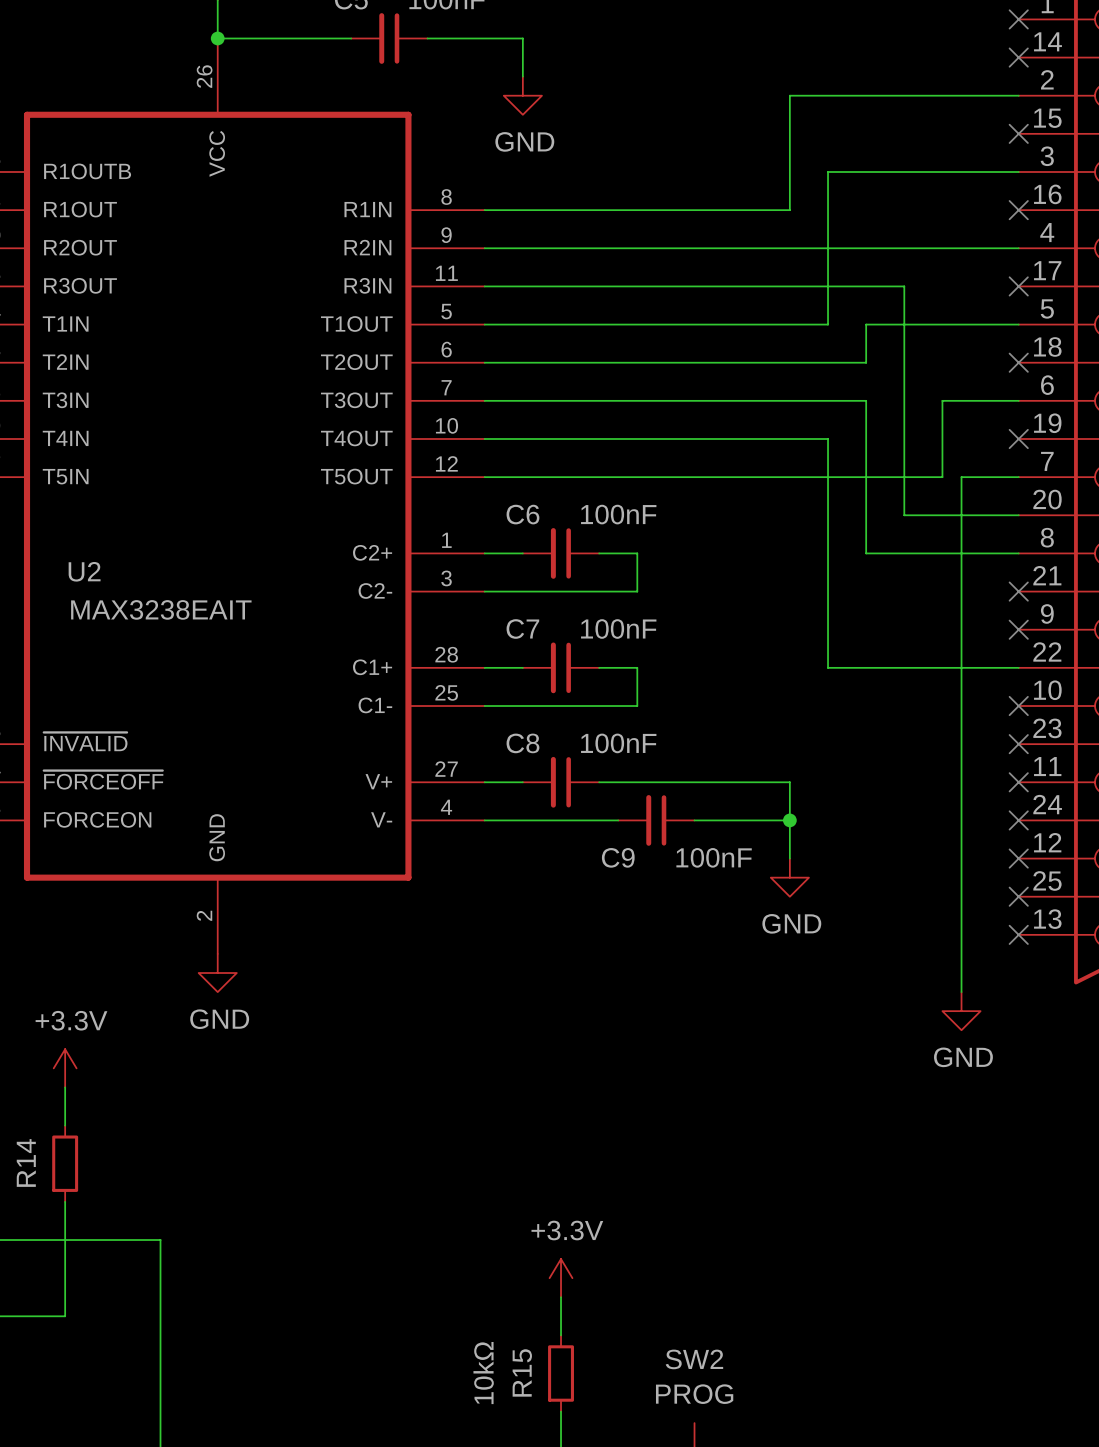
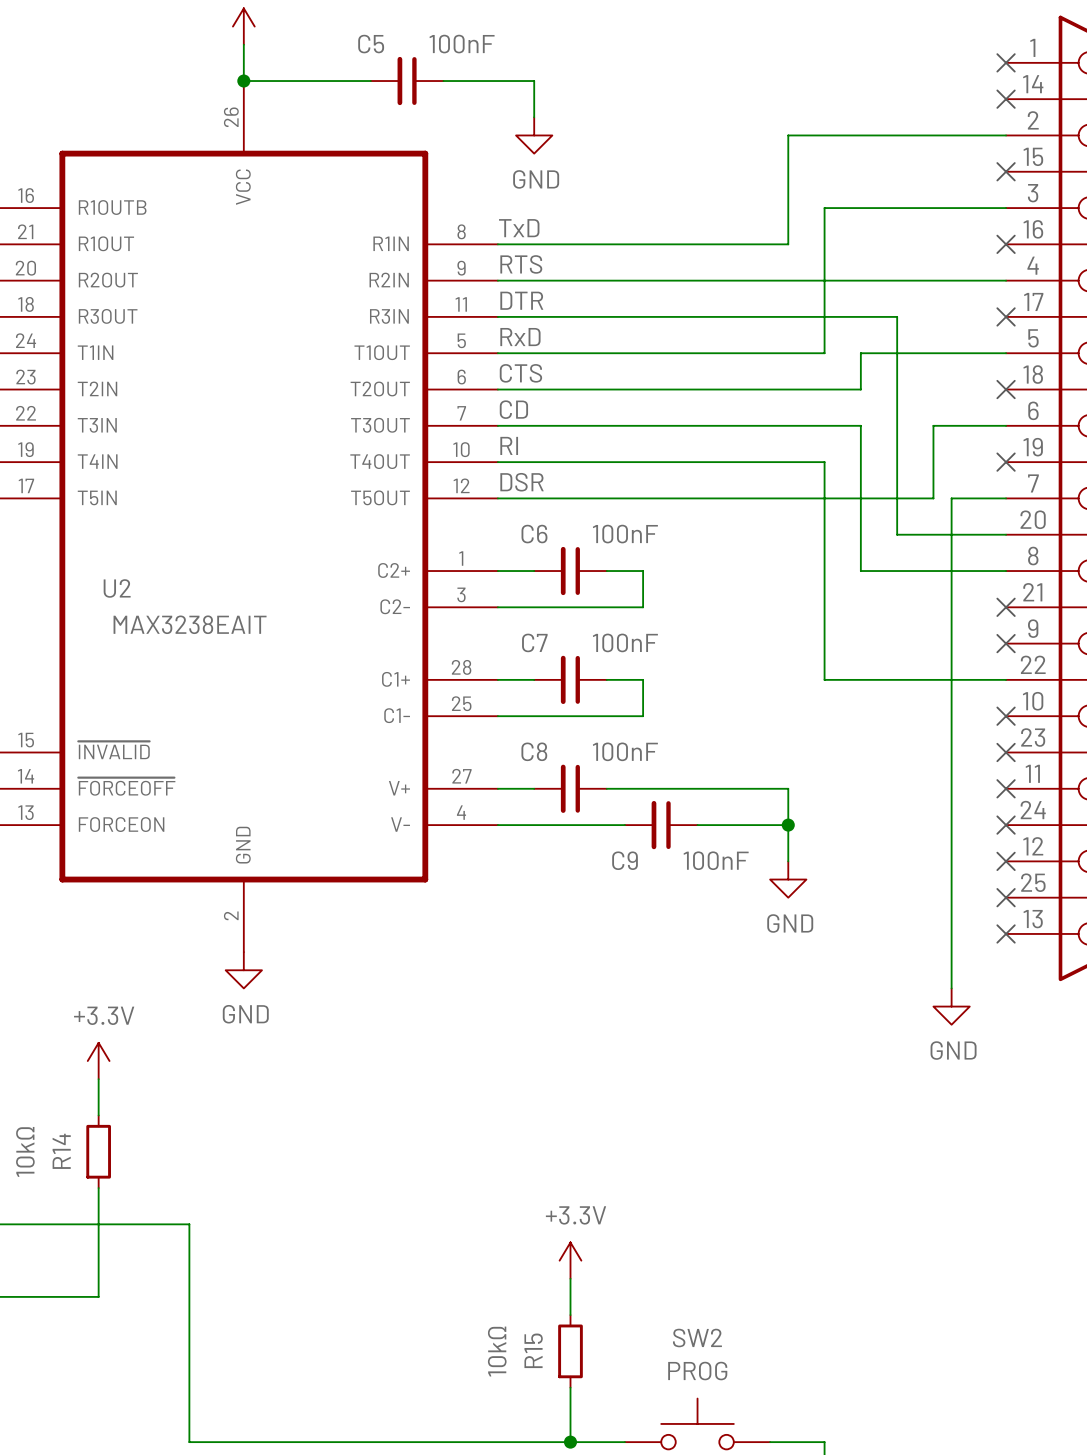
label: none -> TxD (519, 228)
label: none -> RTS (521, 264)
label: none -> DTR (521, 300)
label: none -> RxD (520, 337)
label: none -> CTS (520, 373)
label: none -> CD (513, 409)
label: none -> RI (509, 445)
label: none -> DSR (522, 482)

